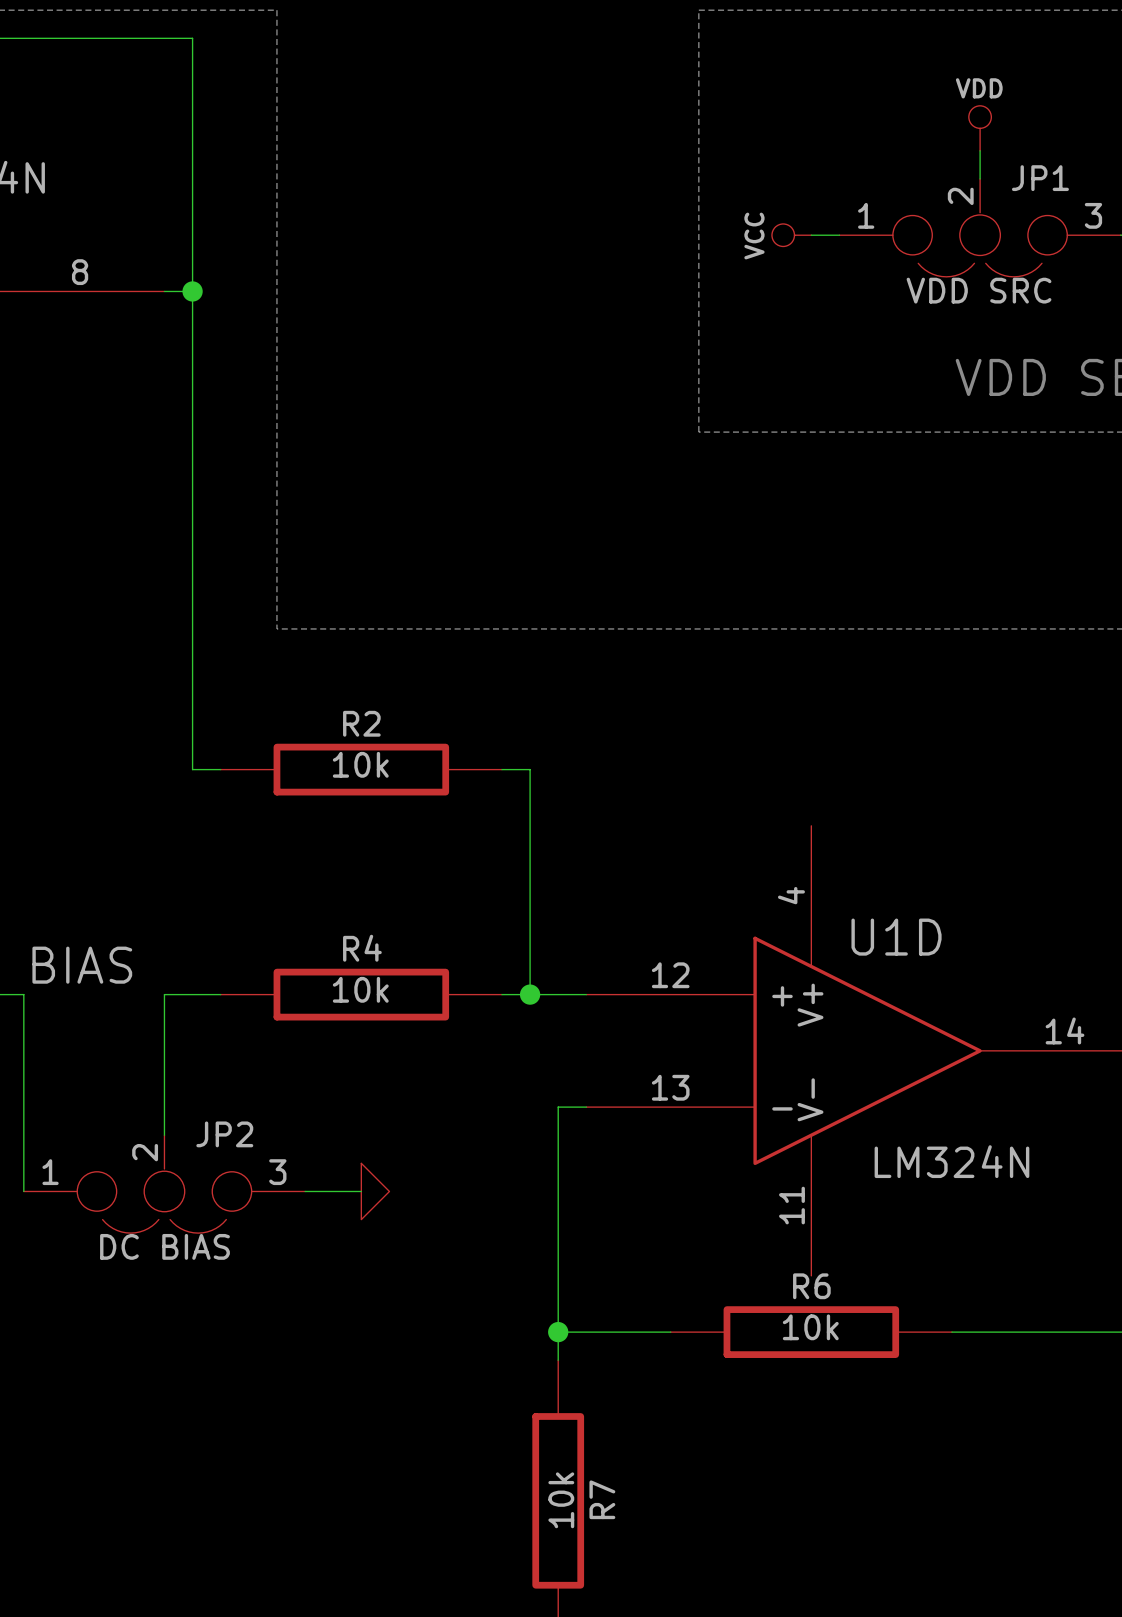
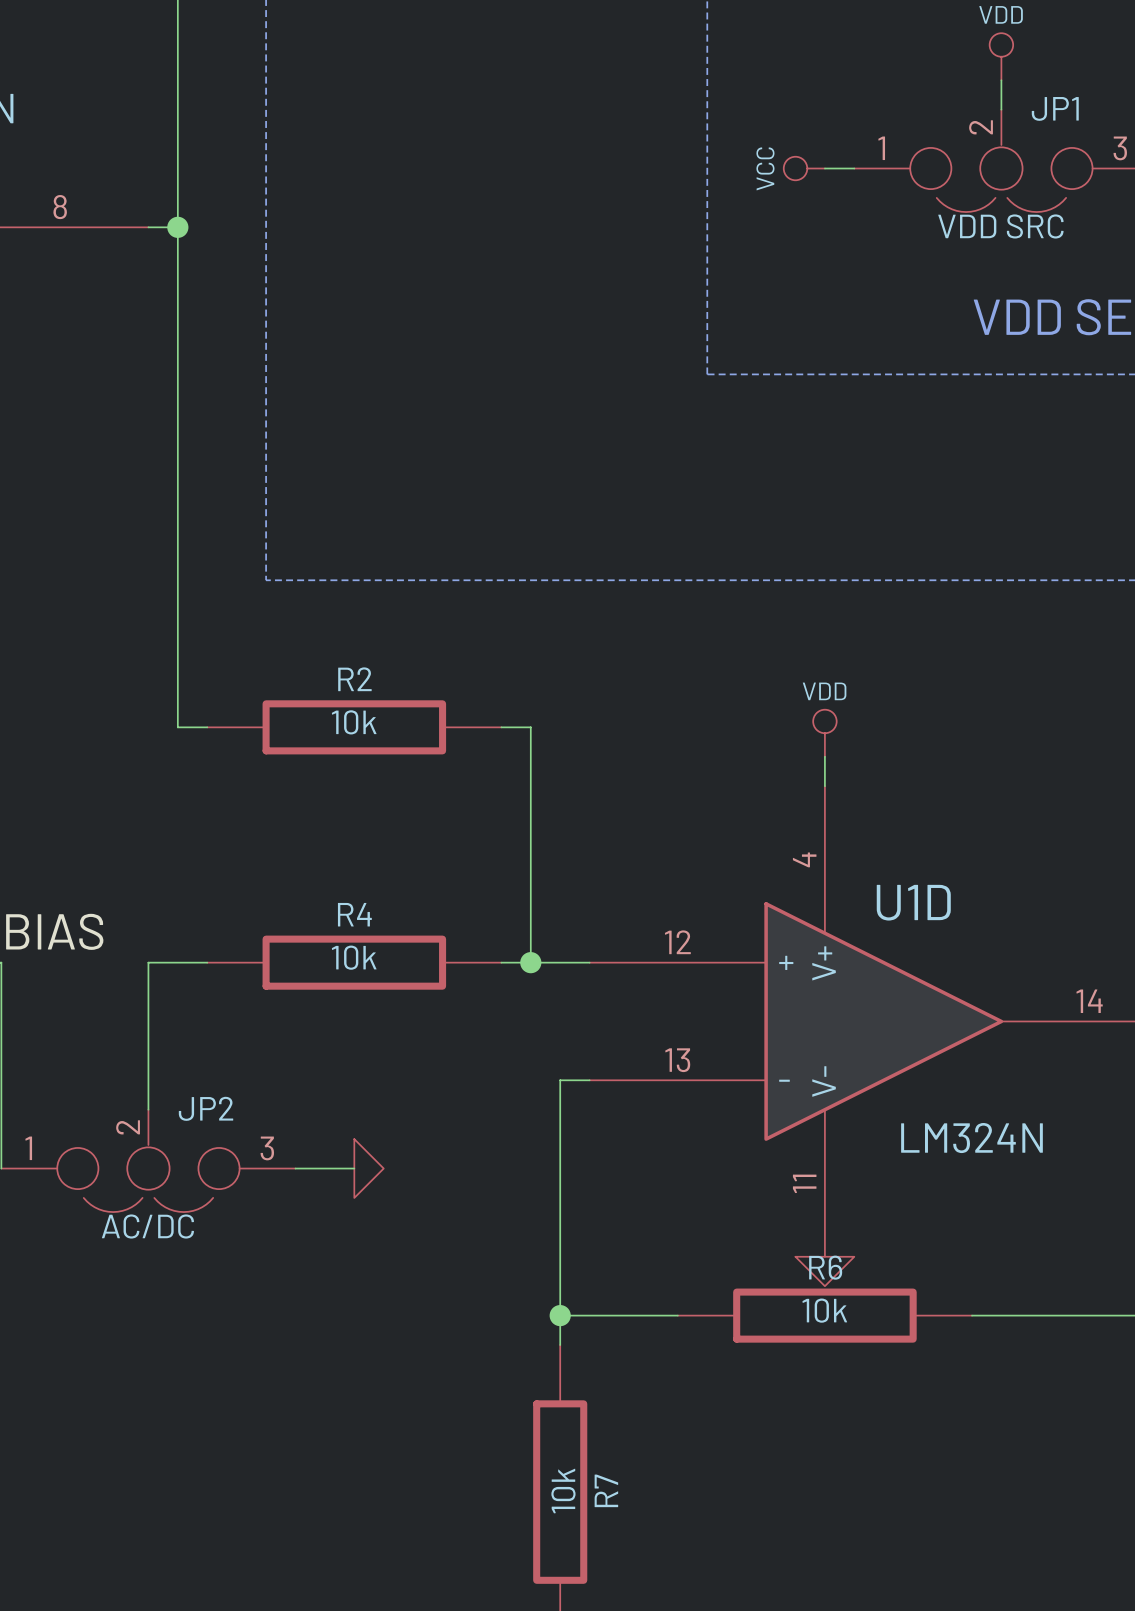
power symbol: none -> VDD (824, 733)
wire: none -> (824, 756) (824, 786)
JP2 value: DC BIAS (164, 1246) -> AC/DC (147, 1226)
power symbol: none -> (824, 1271)

